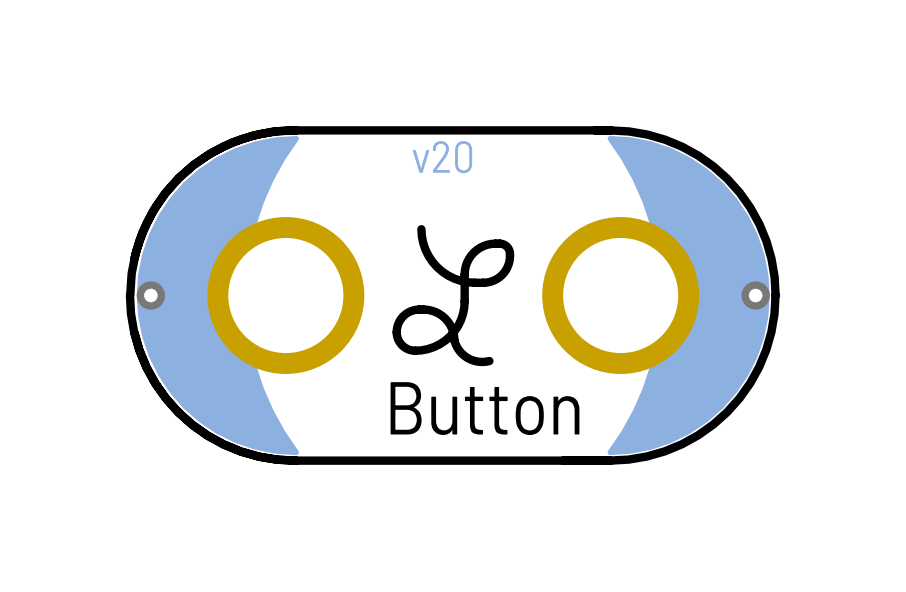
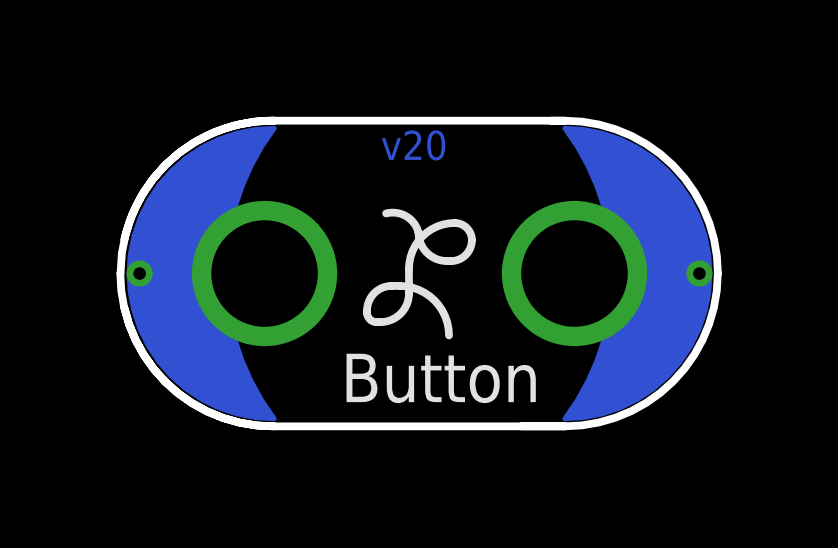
drawing shape: [392, 225, 515, 367] -> [363, 208, 476, 340]

